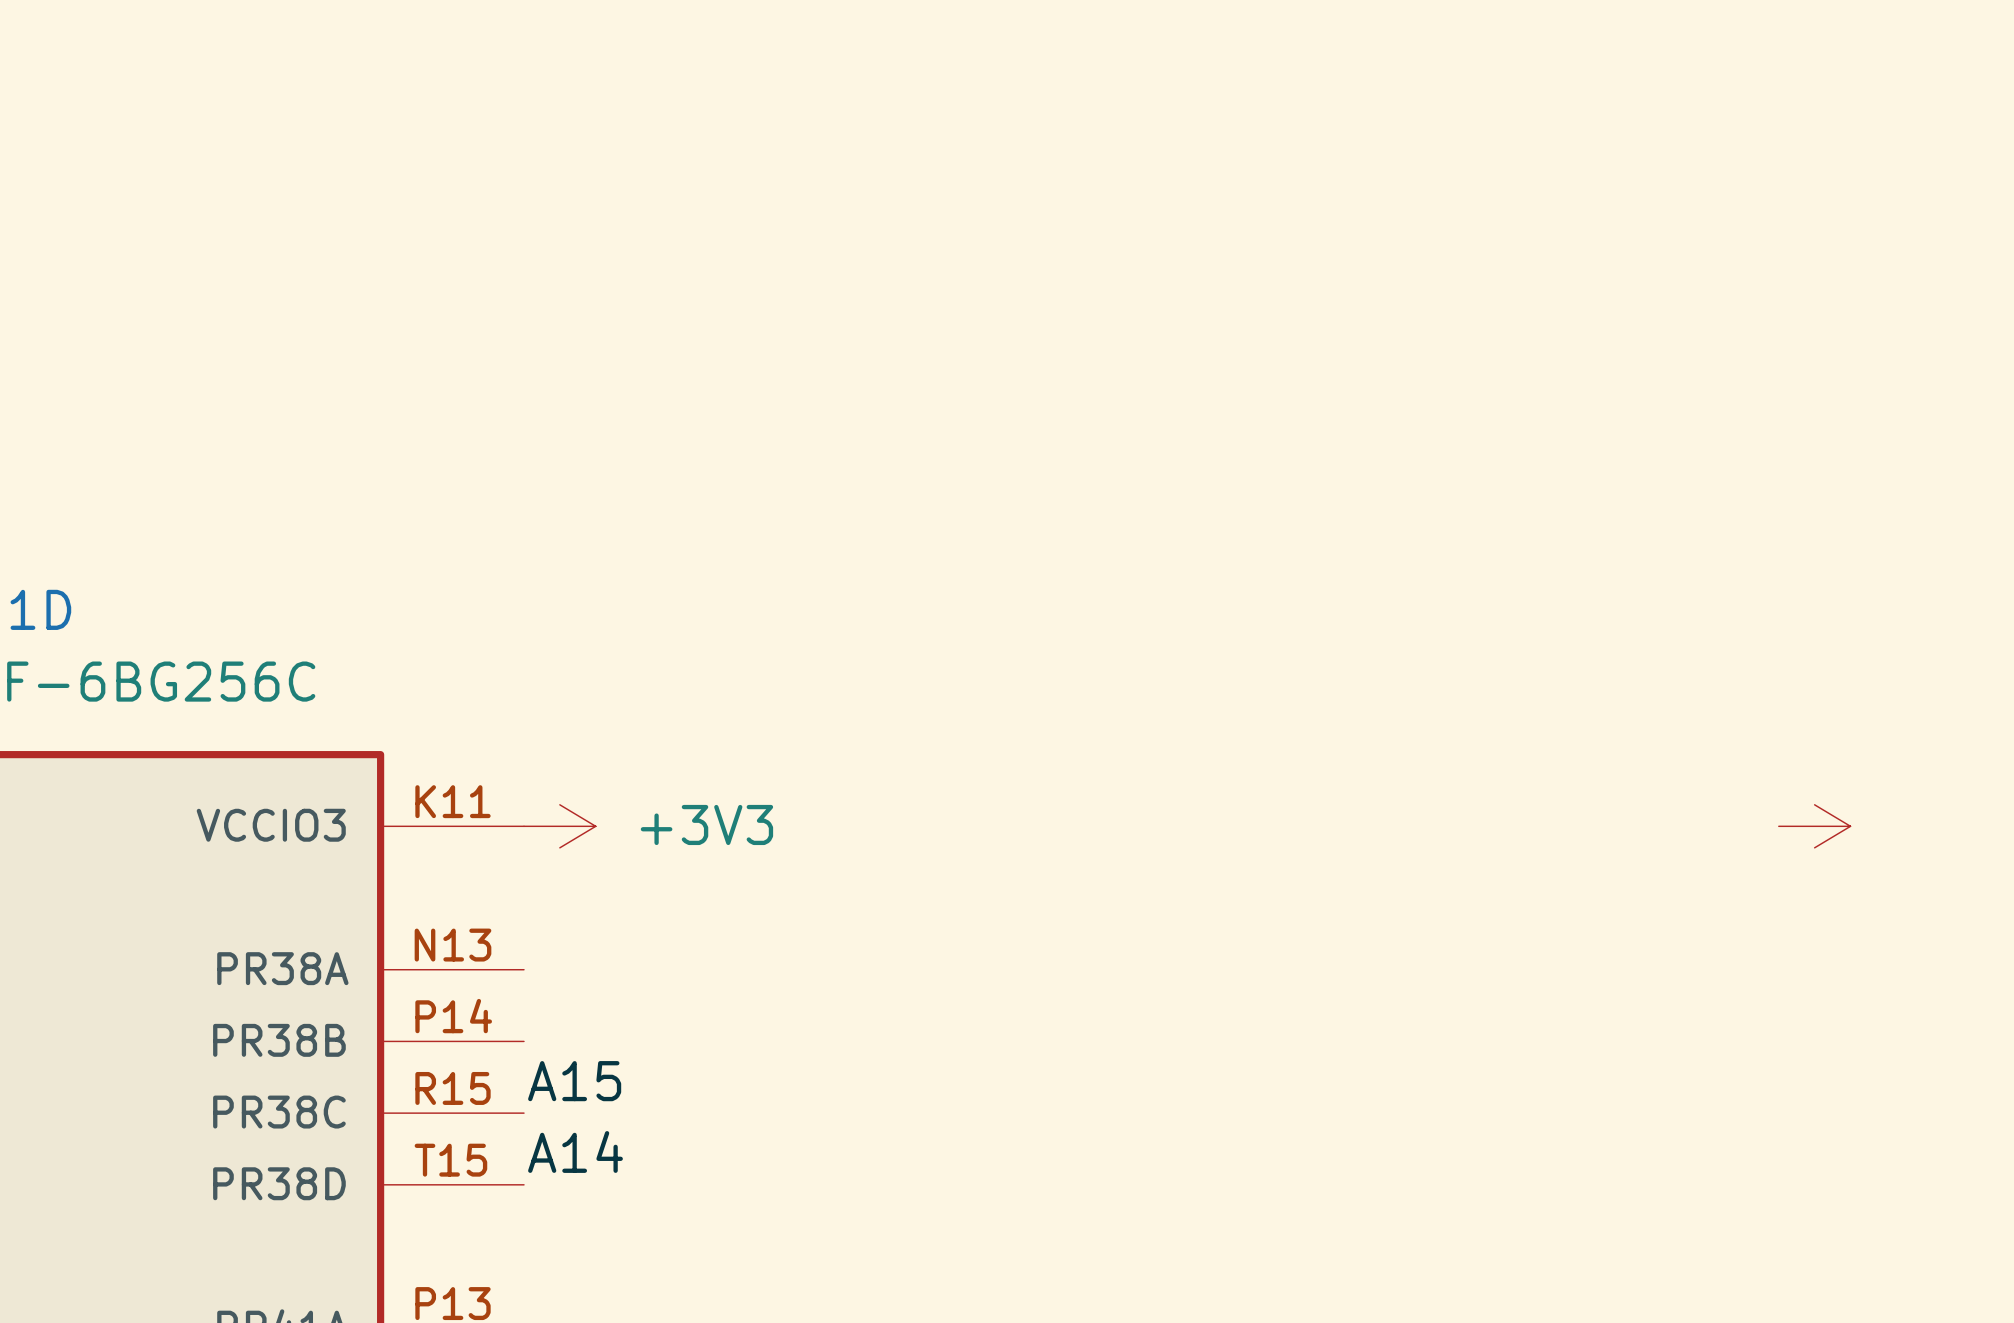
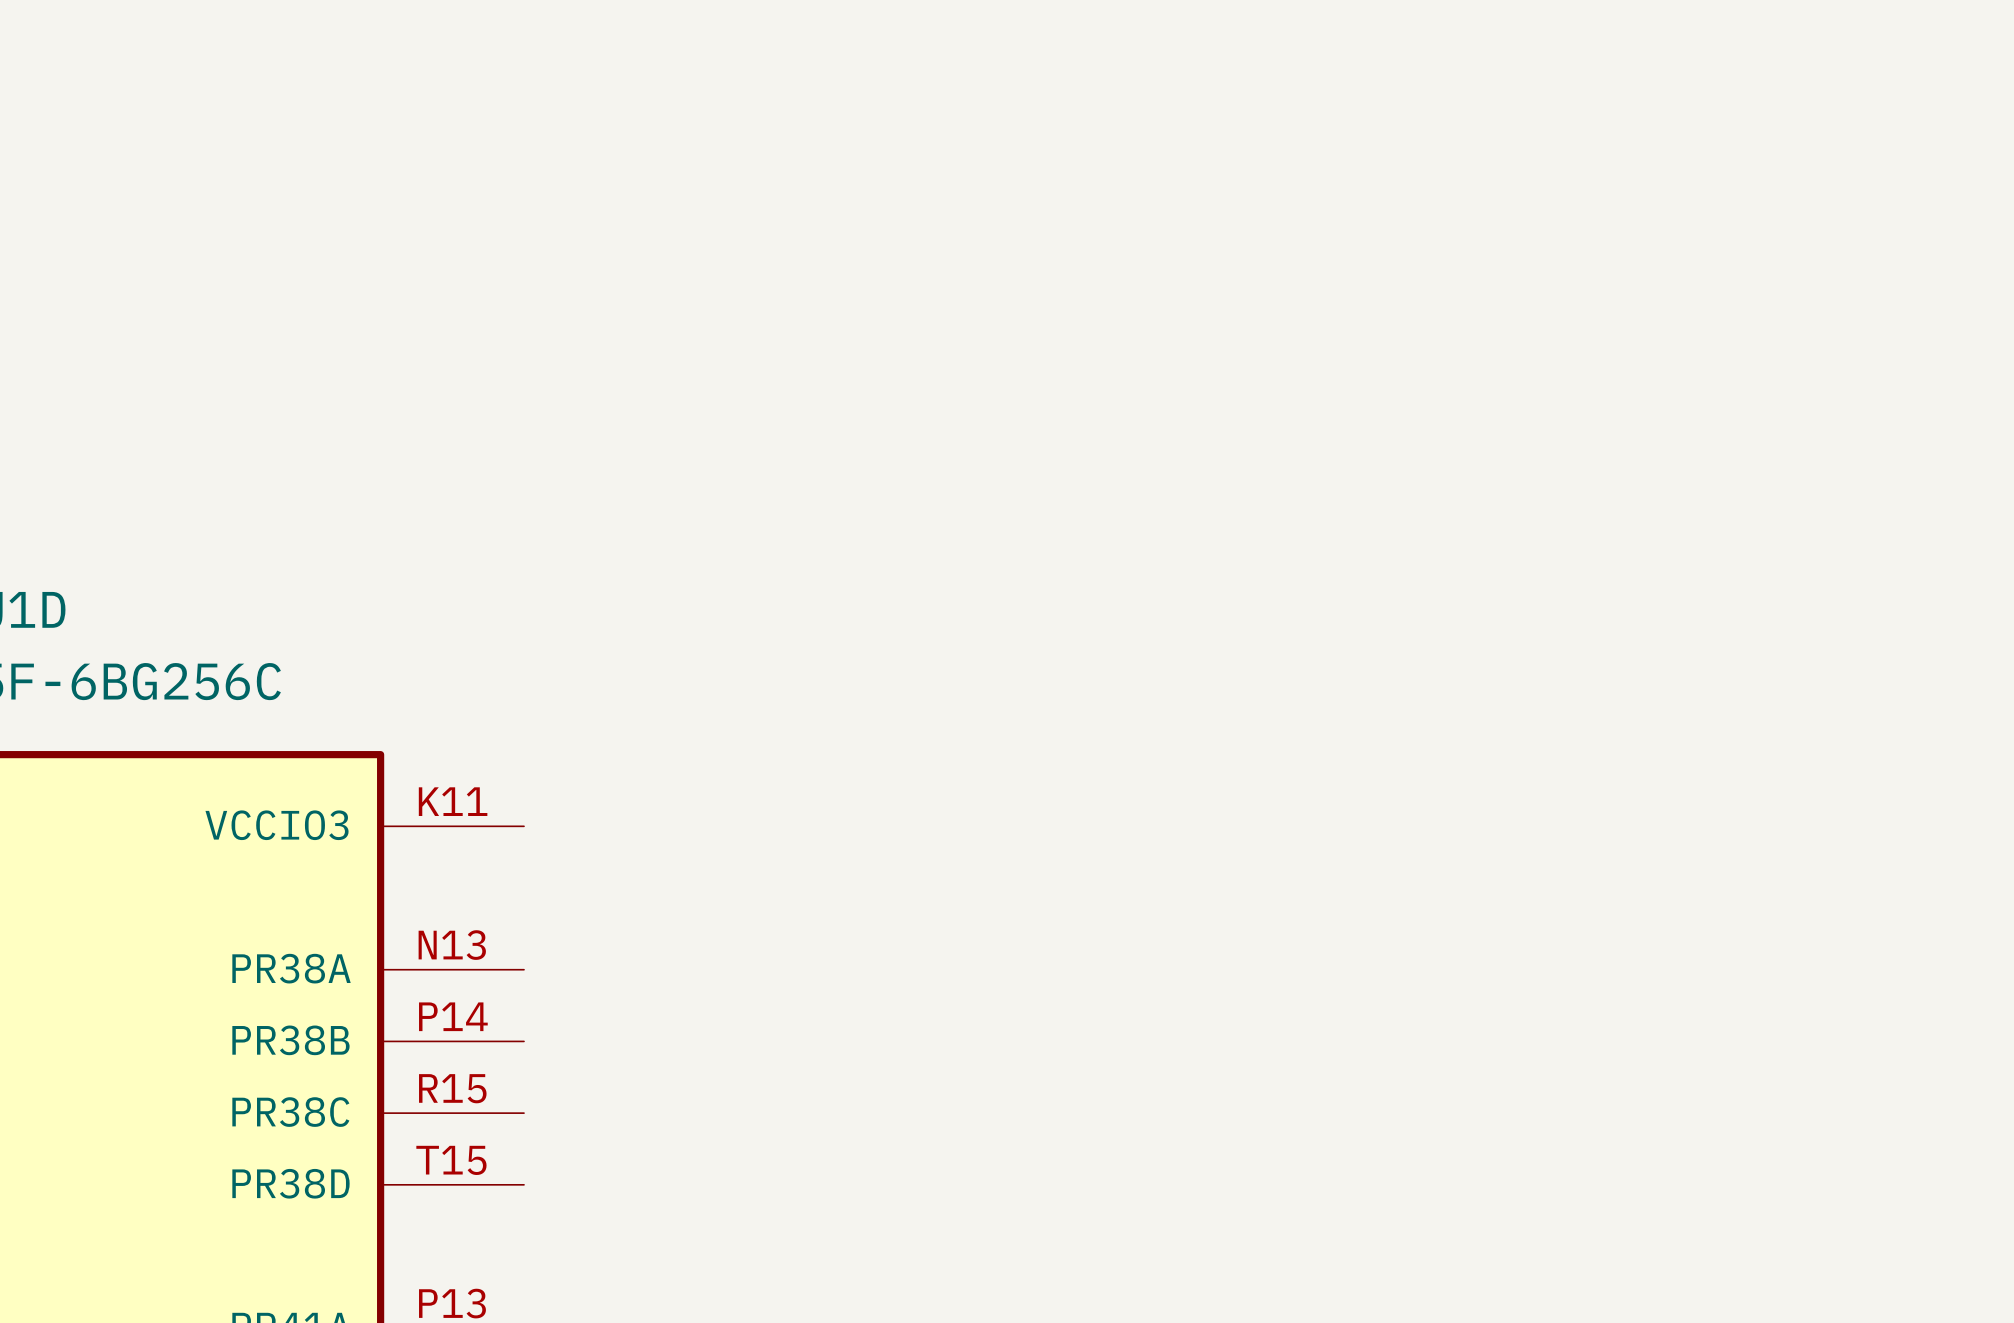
power symbol: +3V3 (559, 826) -> none
power symbol: (1814, 826) -> none
label: A15 (574, 1081) -> none
label: A14 (575, 1151) -> none

